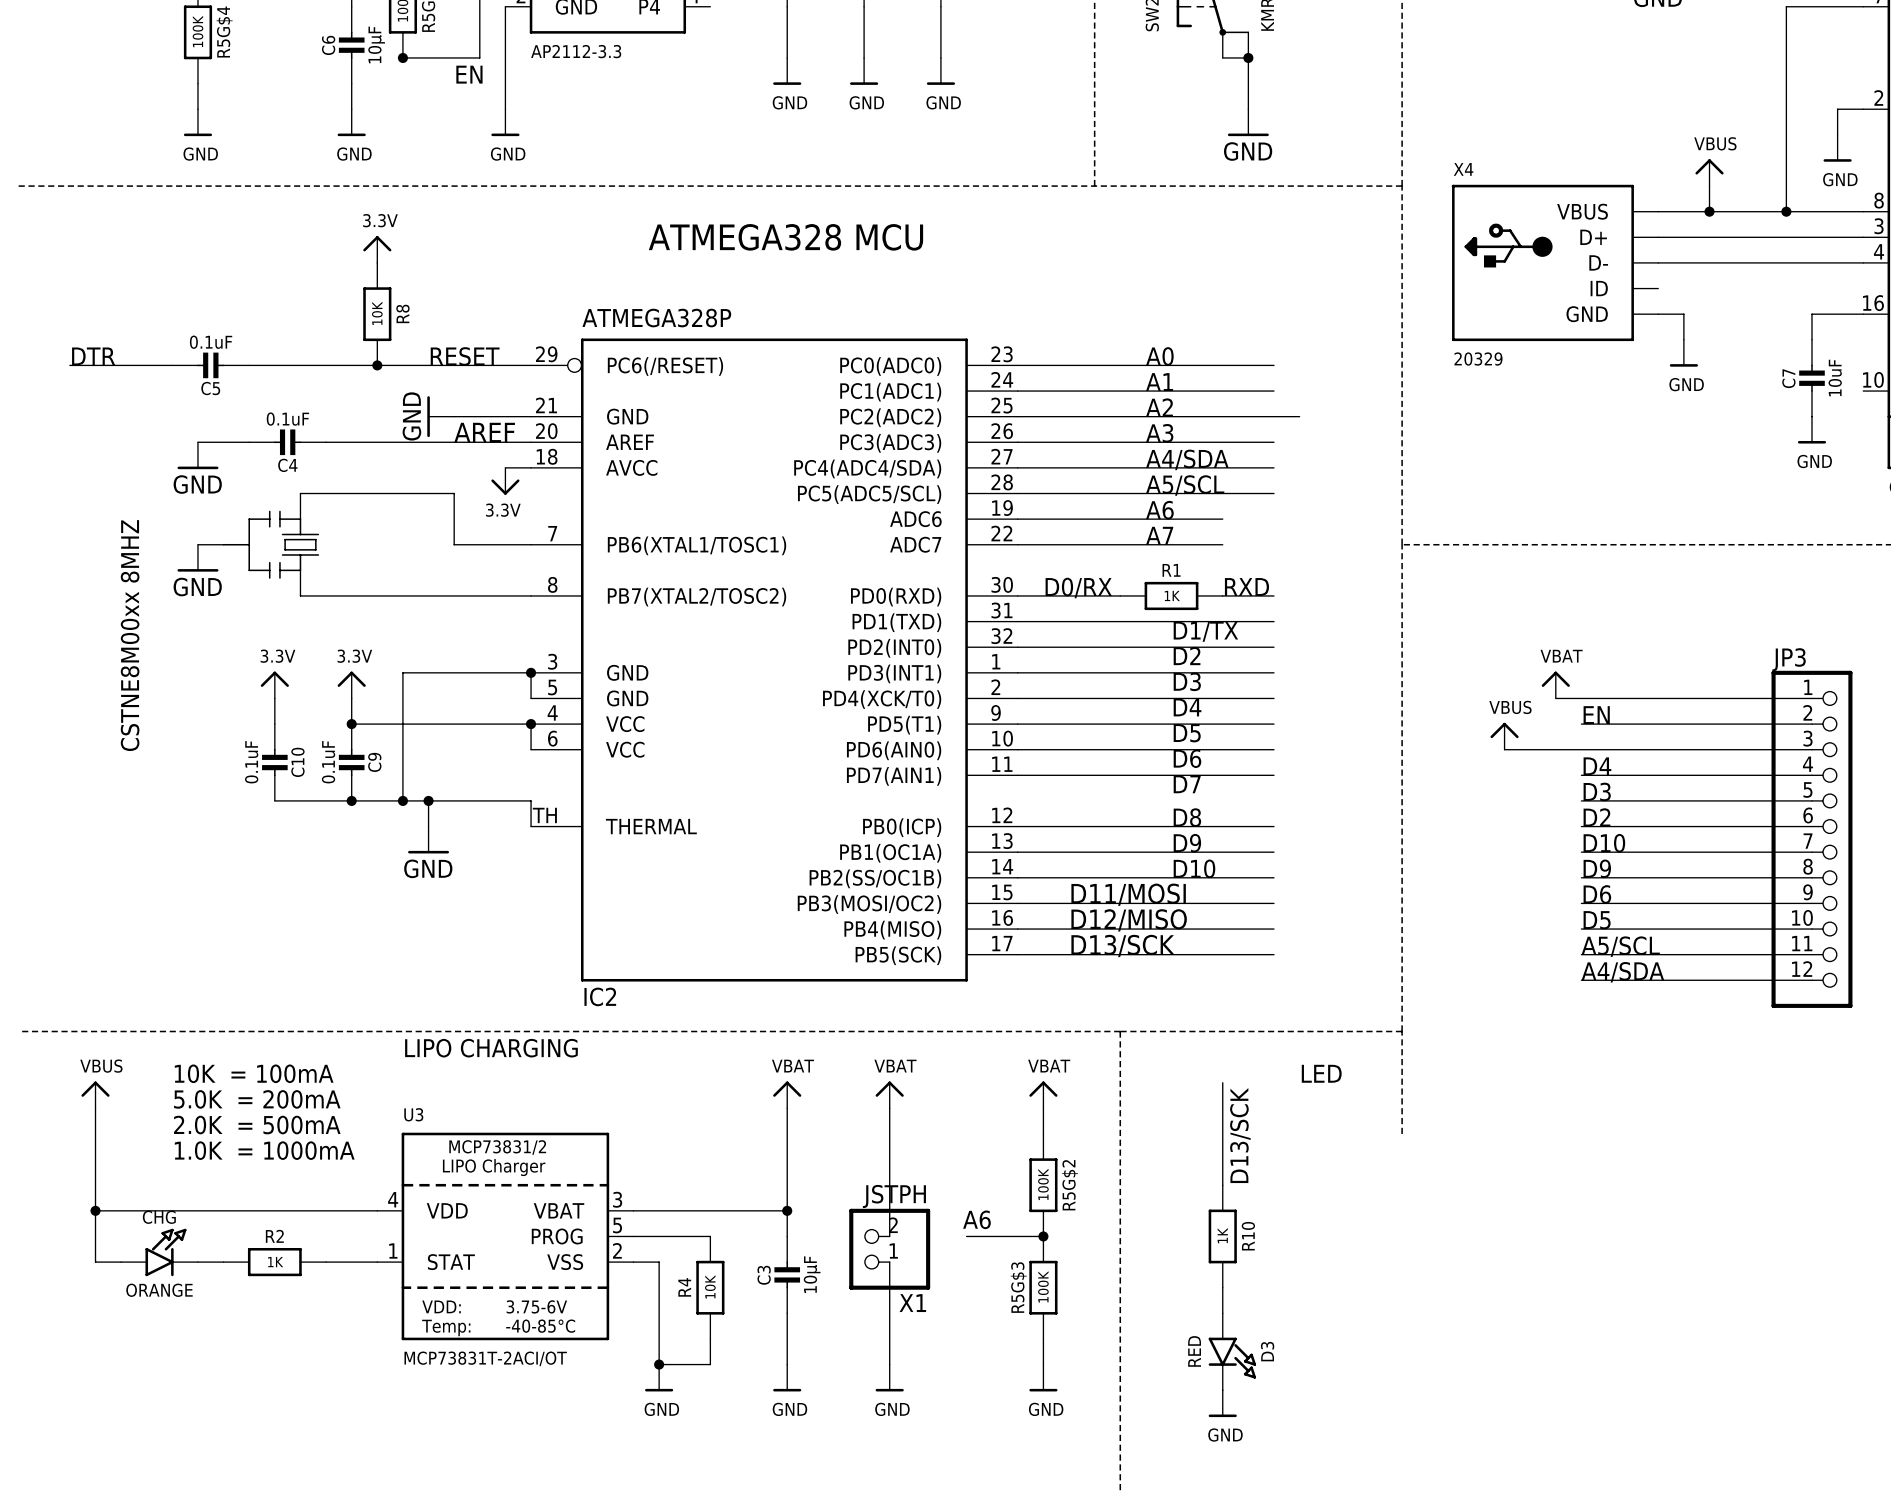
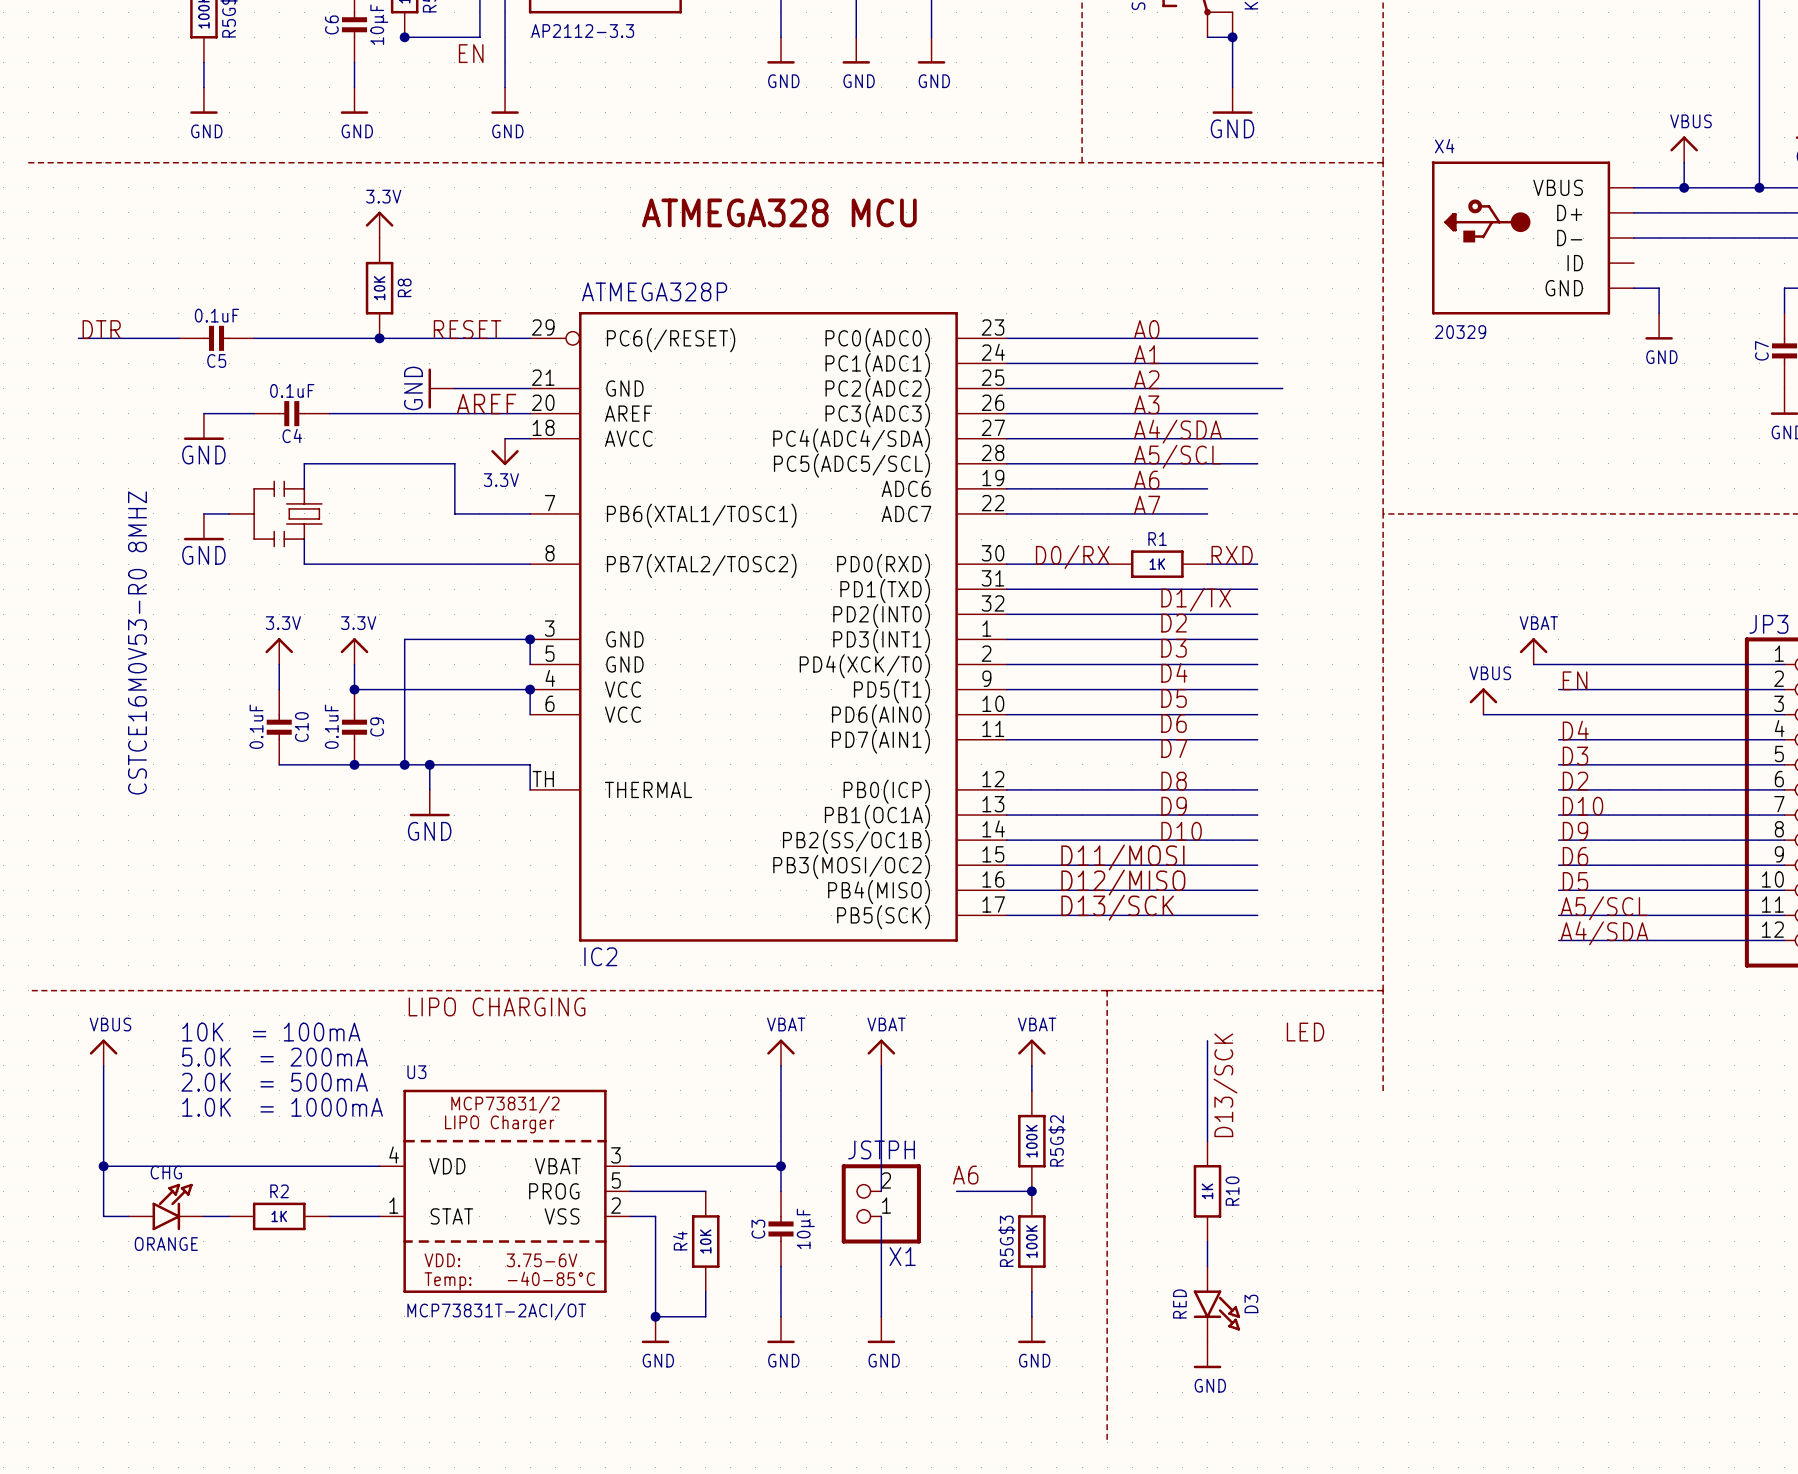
part value: CSTNE8M00xx 8MHZ (130, 635) -> CSTCE16M0V53-R0 8MHZ (137, 642)

